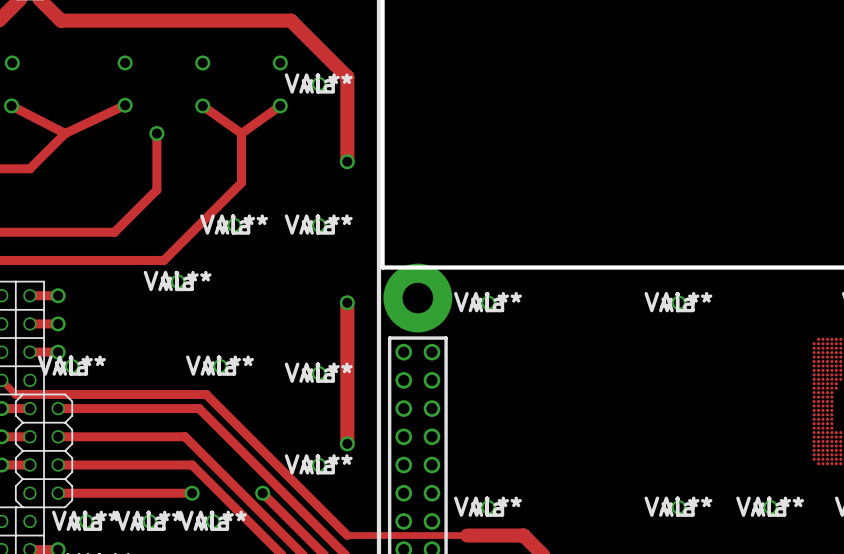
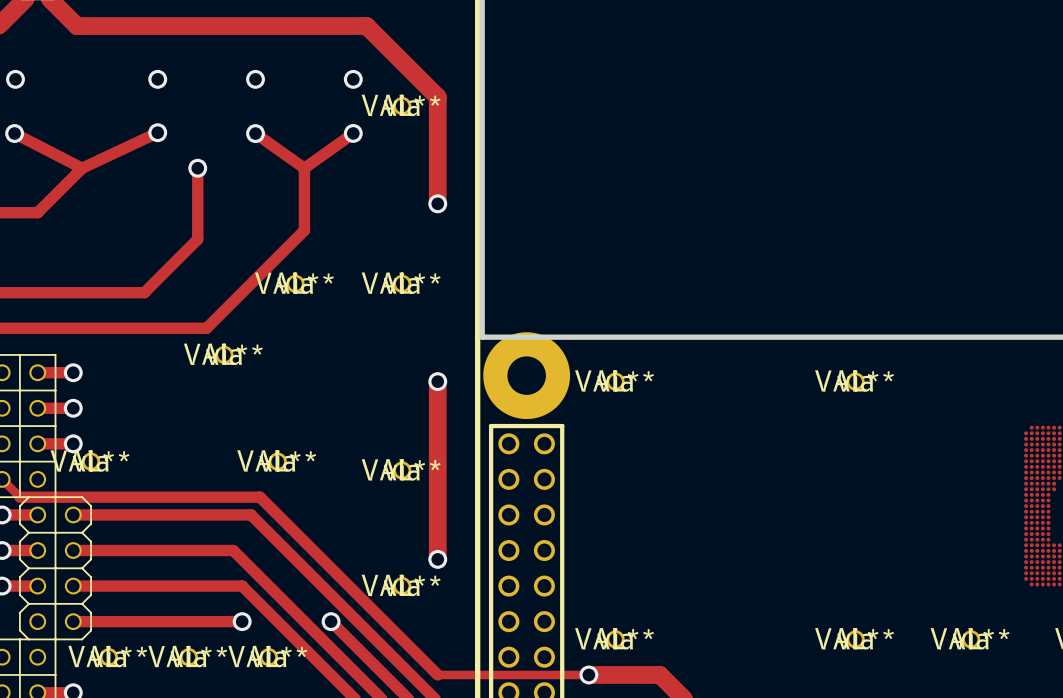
via: none -> (588, 674)

